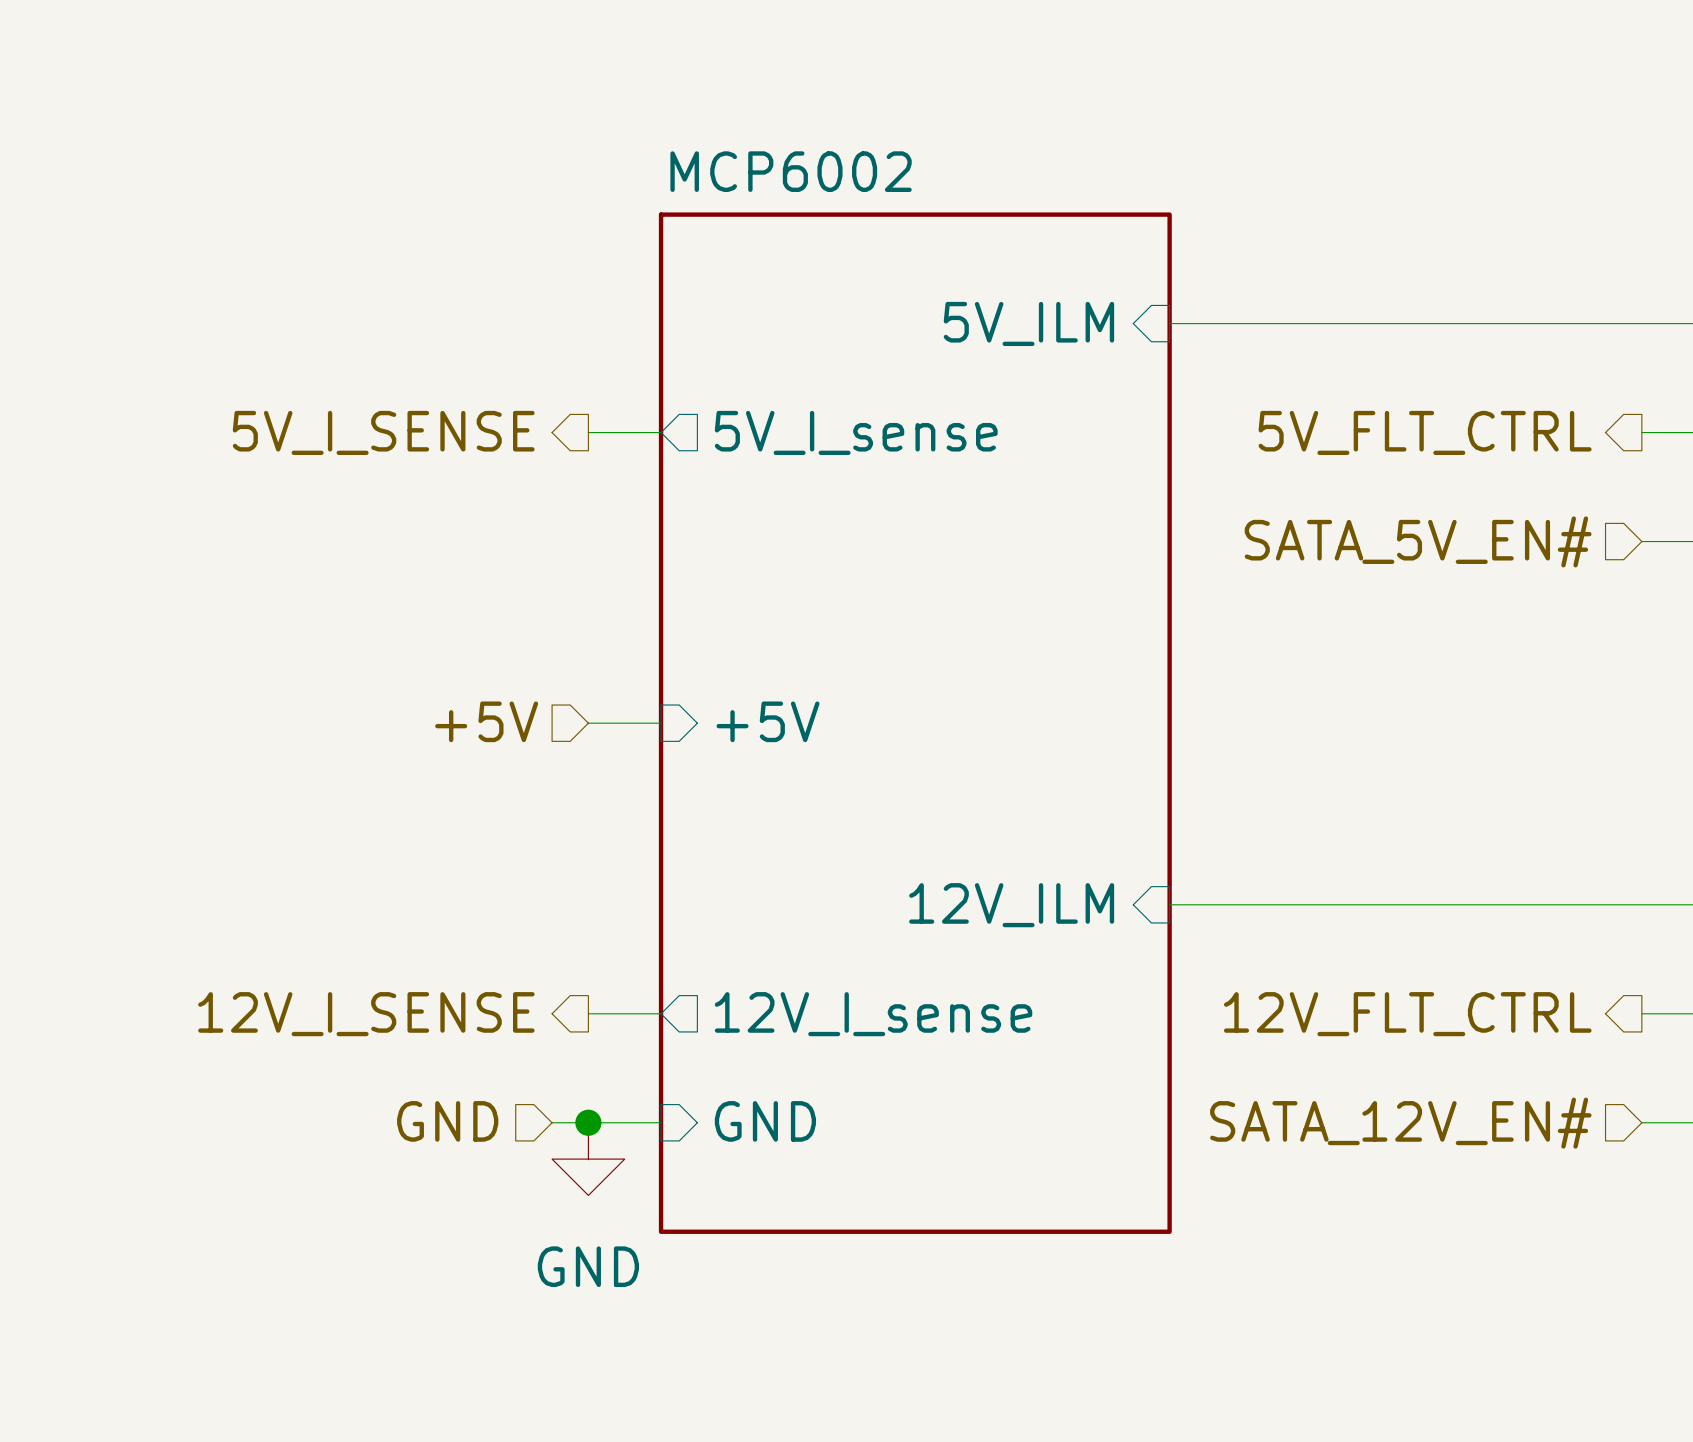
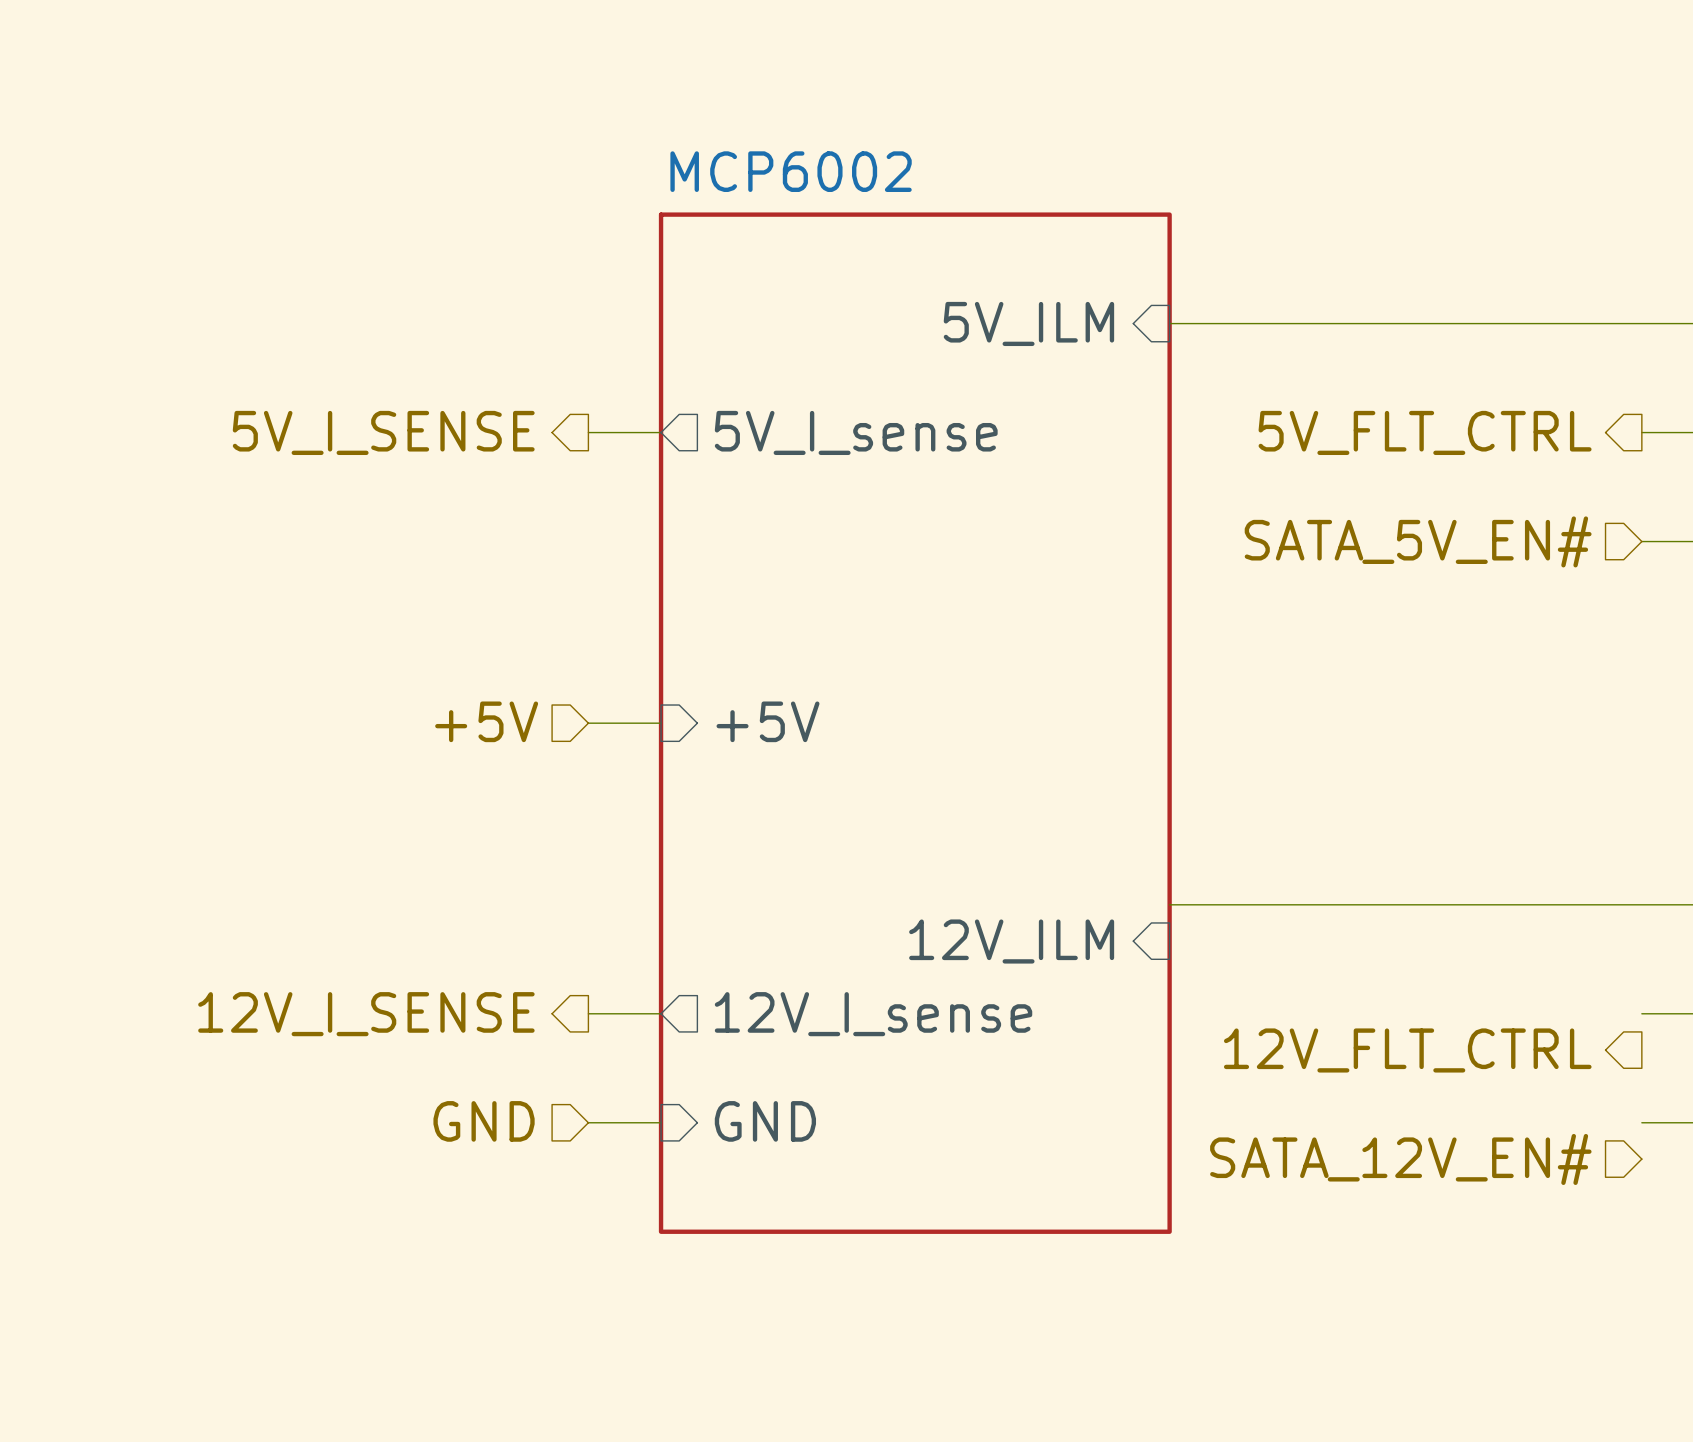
sheet pin position: 12V_ILM (1011, 905) -> 12V_ILM (1011, 941)
hierarchical label position: 12V_FLT_CTRL (1407, 1014) -> 12V_FLT_CTRL (1407, 1050)
hierarchical label position: GND (447, 1121) -> GND (484, 1121)
wire: (552, 1122) (588, 1122) -> none
junction: (588, 1122) -> none
hierarchical label position: SATA_12V_EN# (1400, 1123) -> SATA_12V_EN# (1400, 1159)
power symbol: GND (588, 1159) -> none

